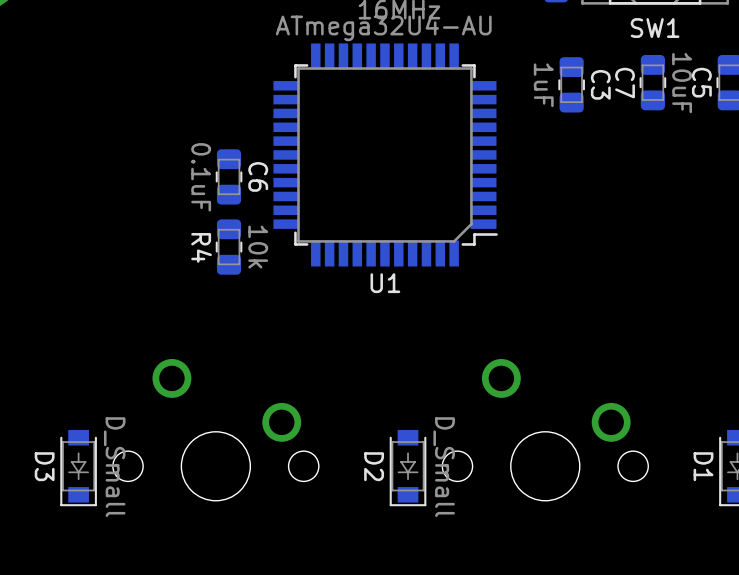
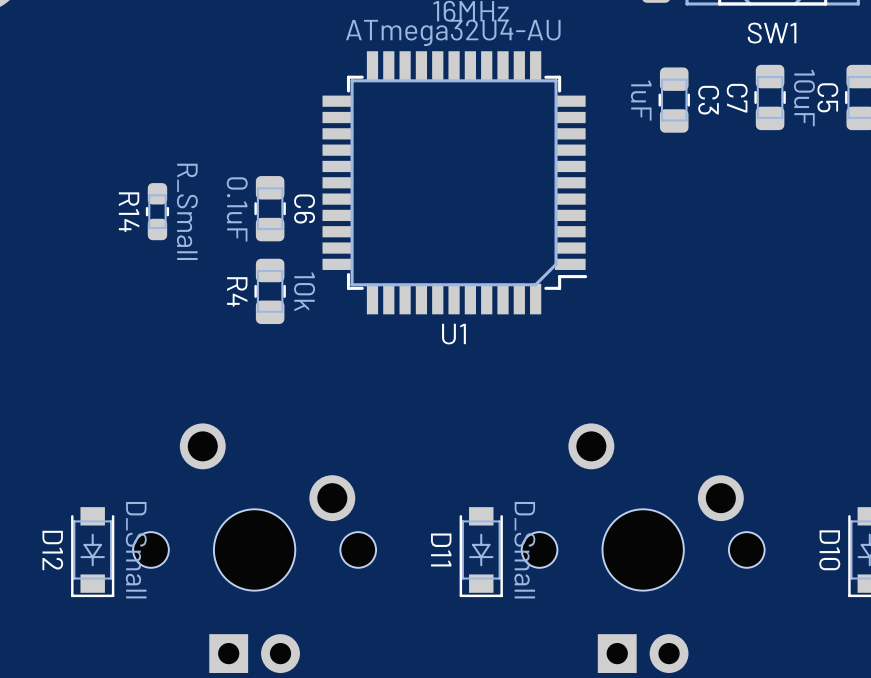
R14: none -> R_Small (157, 211)
part: none -> (254, 548)
part: none -> (643, 548)
D3 name: D3 (44, 466) -> D12 (52, 550)
D2 name: D2 (374, 466) -> D11 (441, 549)
D1 name: D1 (703, 466) -> D10 (829, 550)

